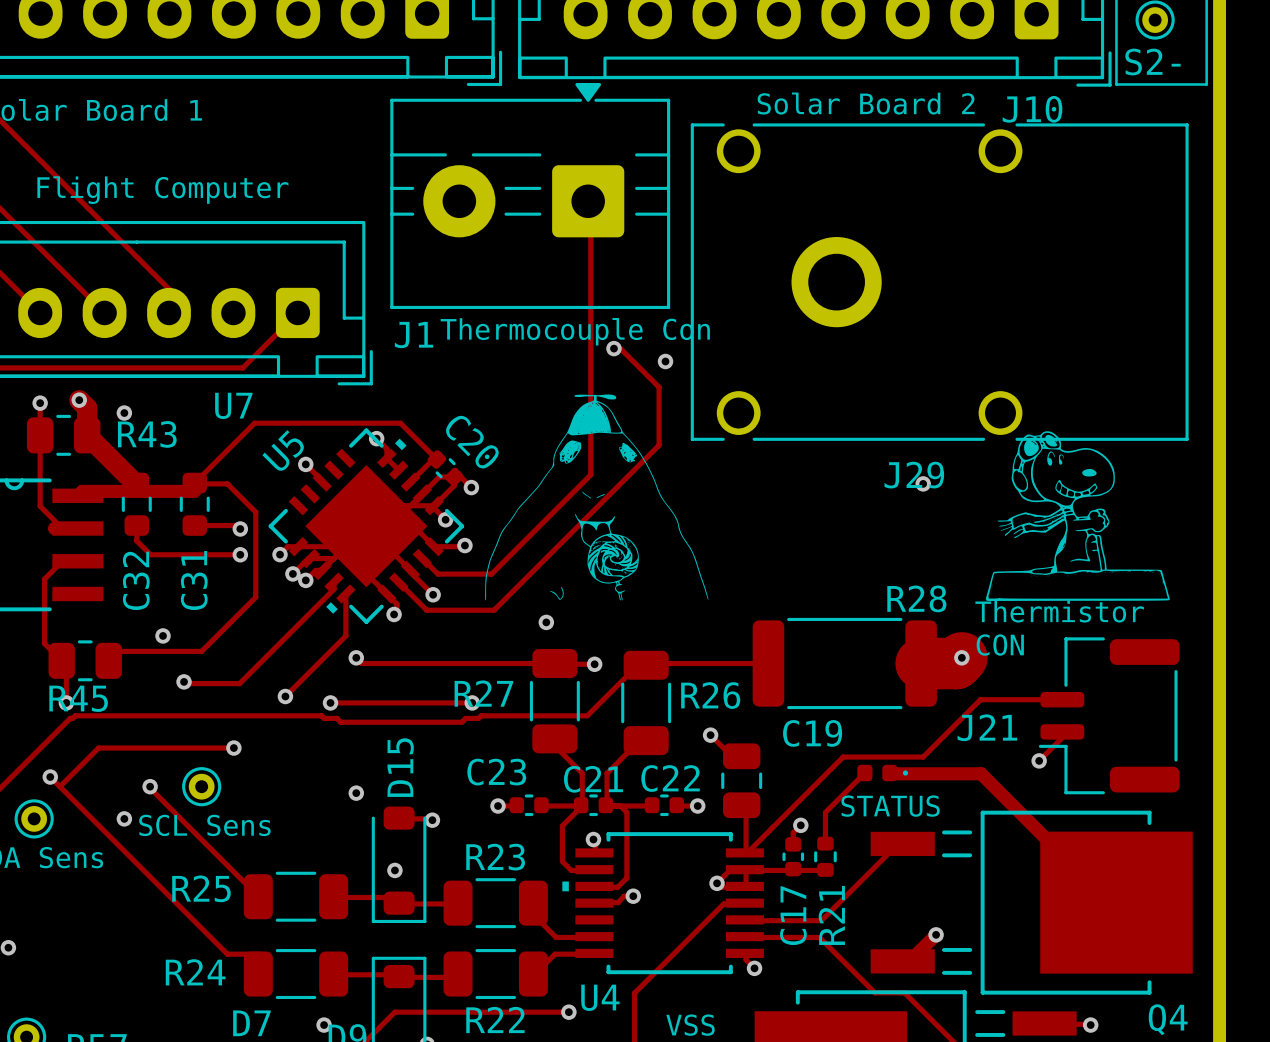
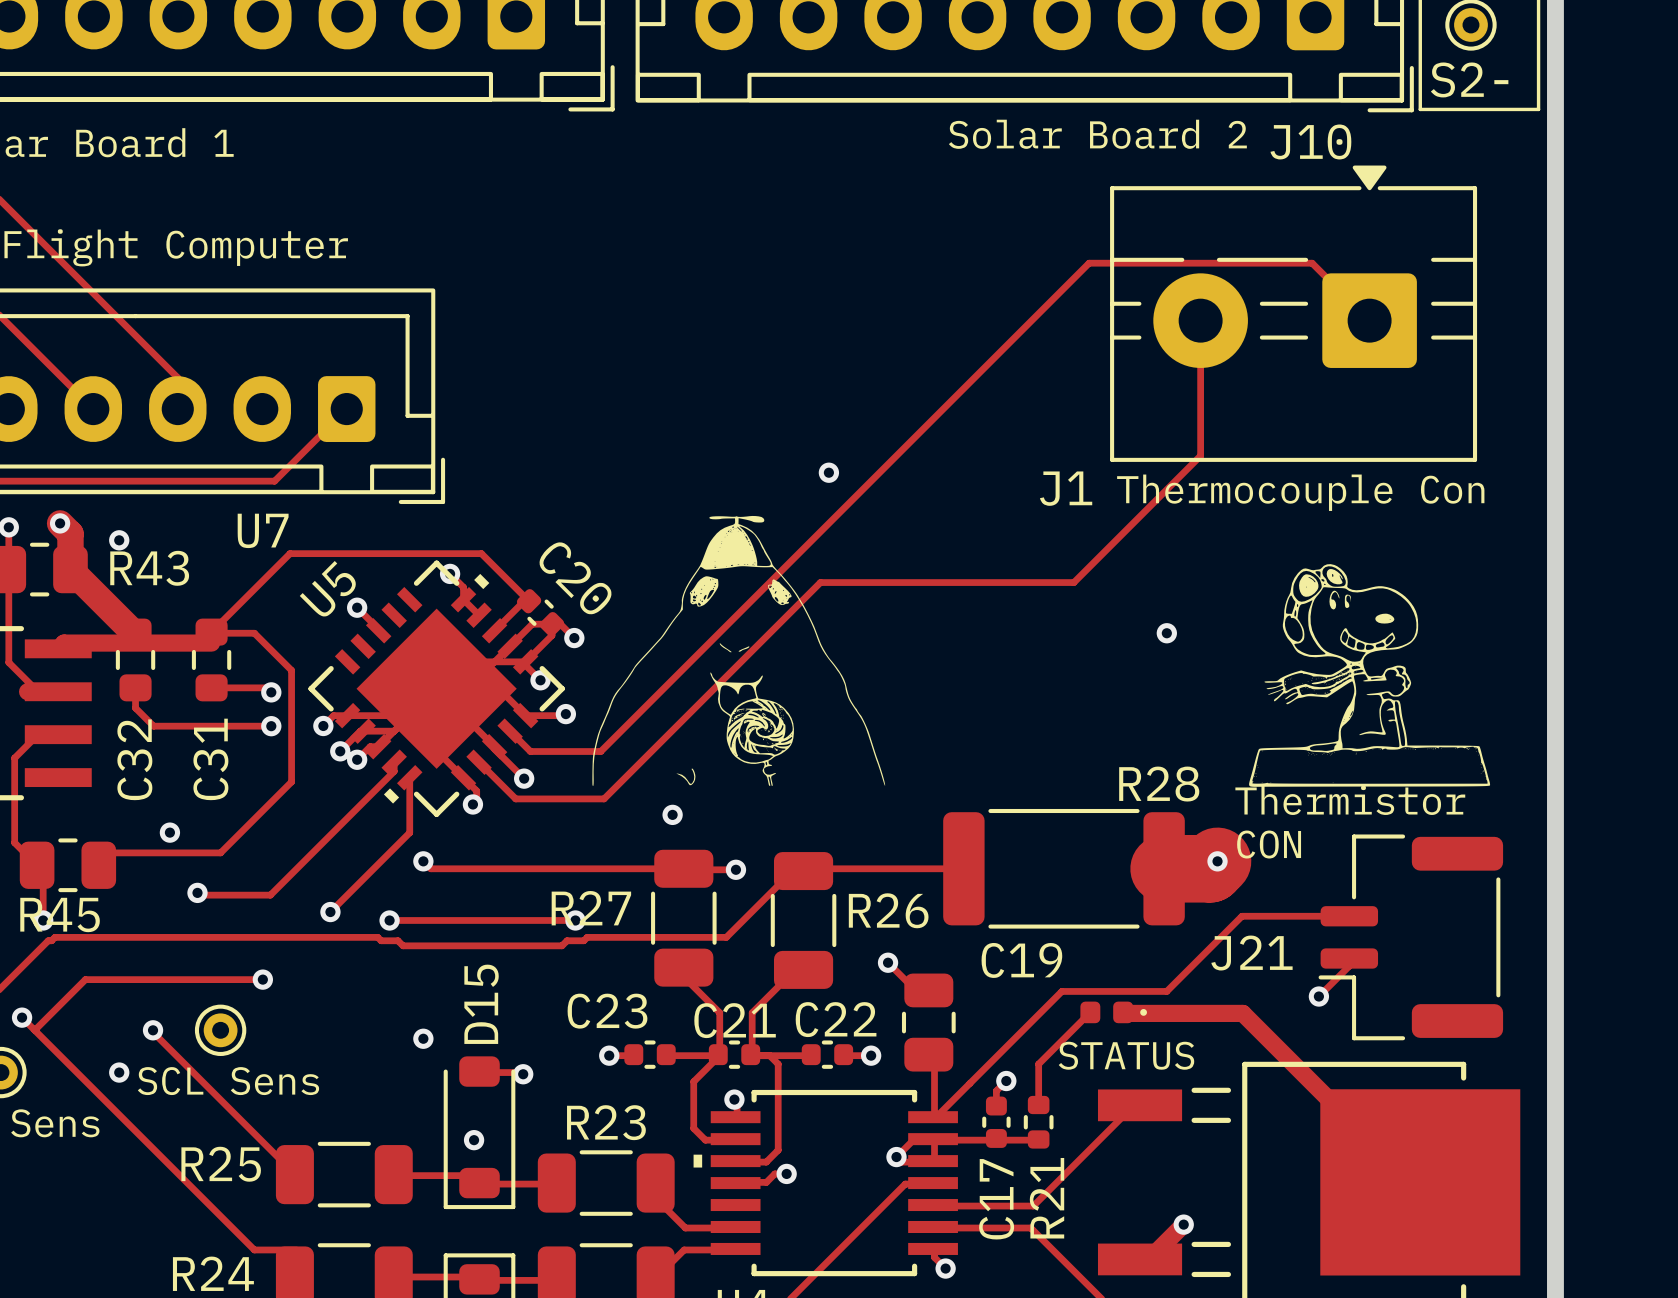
J1 position: (530, 195) -> (1293, 313)
track: (588, 201) (590, 203) (590, 474) -> (1369, 320) (1312, 263) (1089, 263) (730, 621)
J29: (939, 282) -> none
text position: Thermocouple Con (575, 331) -> Thermocouple Con (1300, 492)
J1 name position: J1 (414, 335) -> J1 (1066, 488)
track: (613, 348) (620, 348) (659, 387) (659, 445) -> (1200, 320) (1200, 455) (1073, 582) (820, 582)
via: (613, 348) -> none

